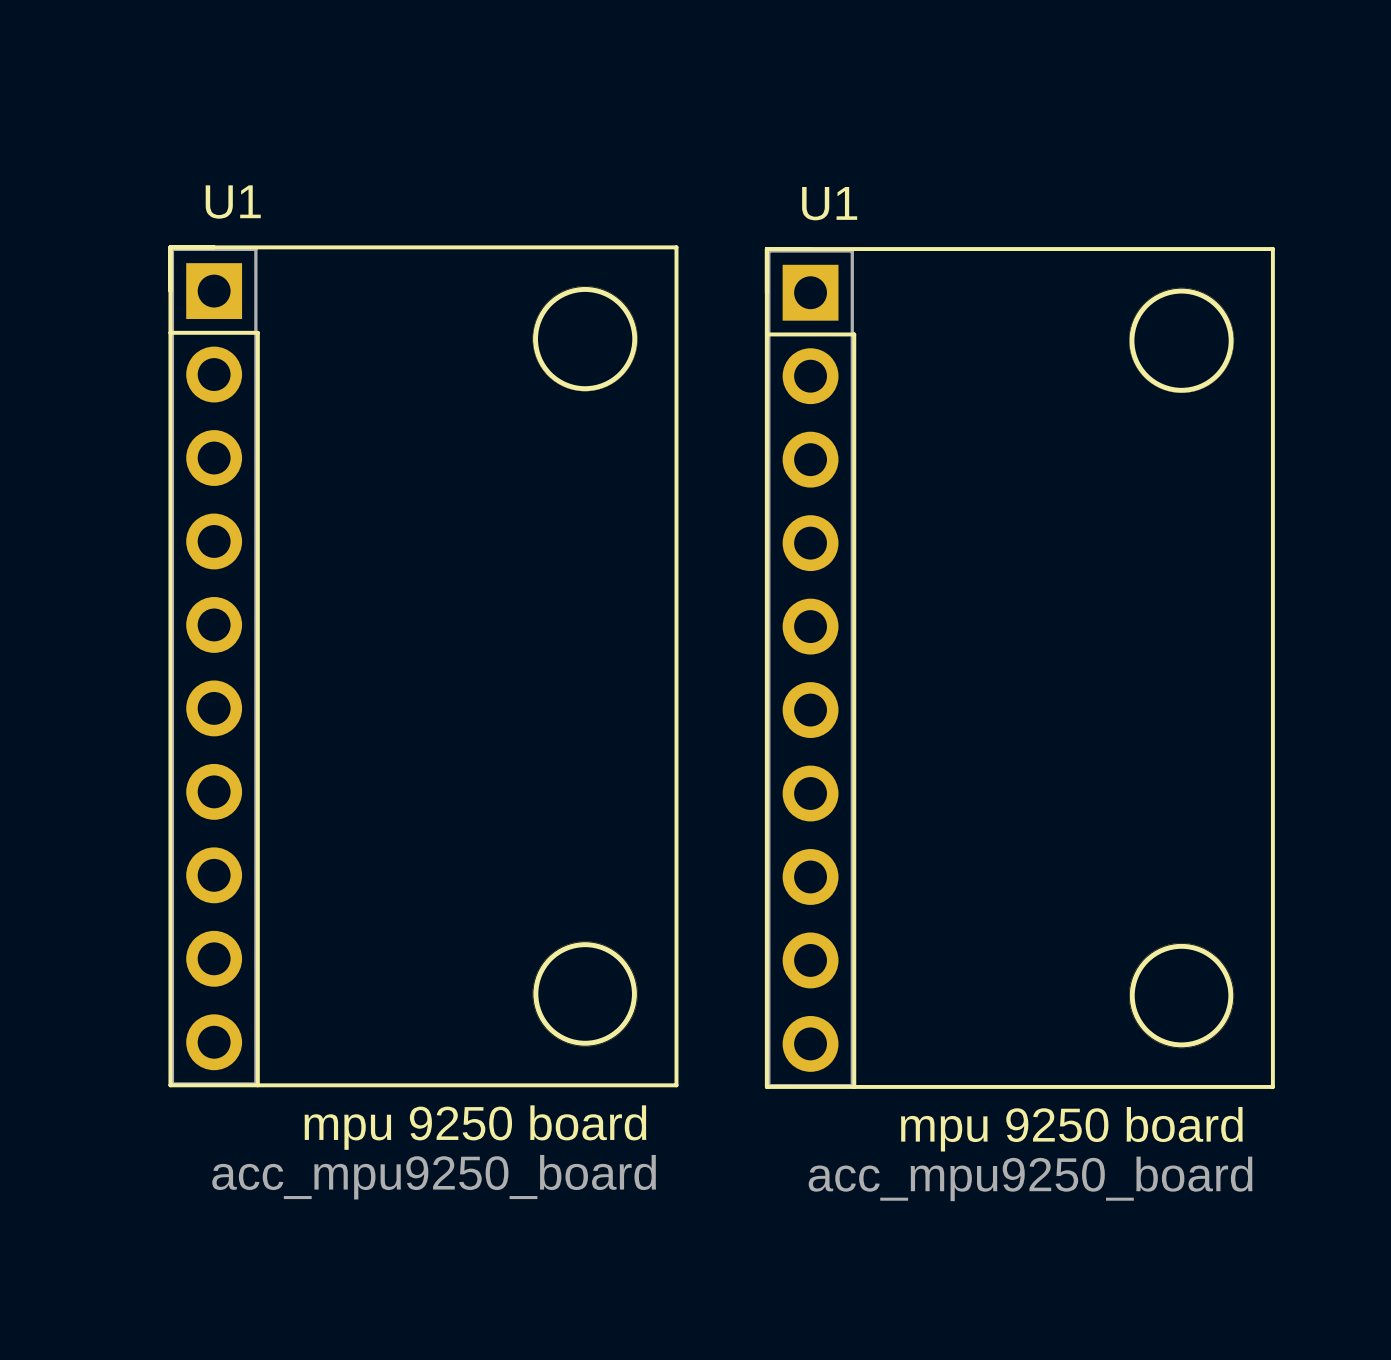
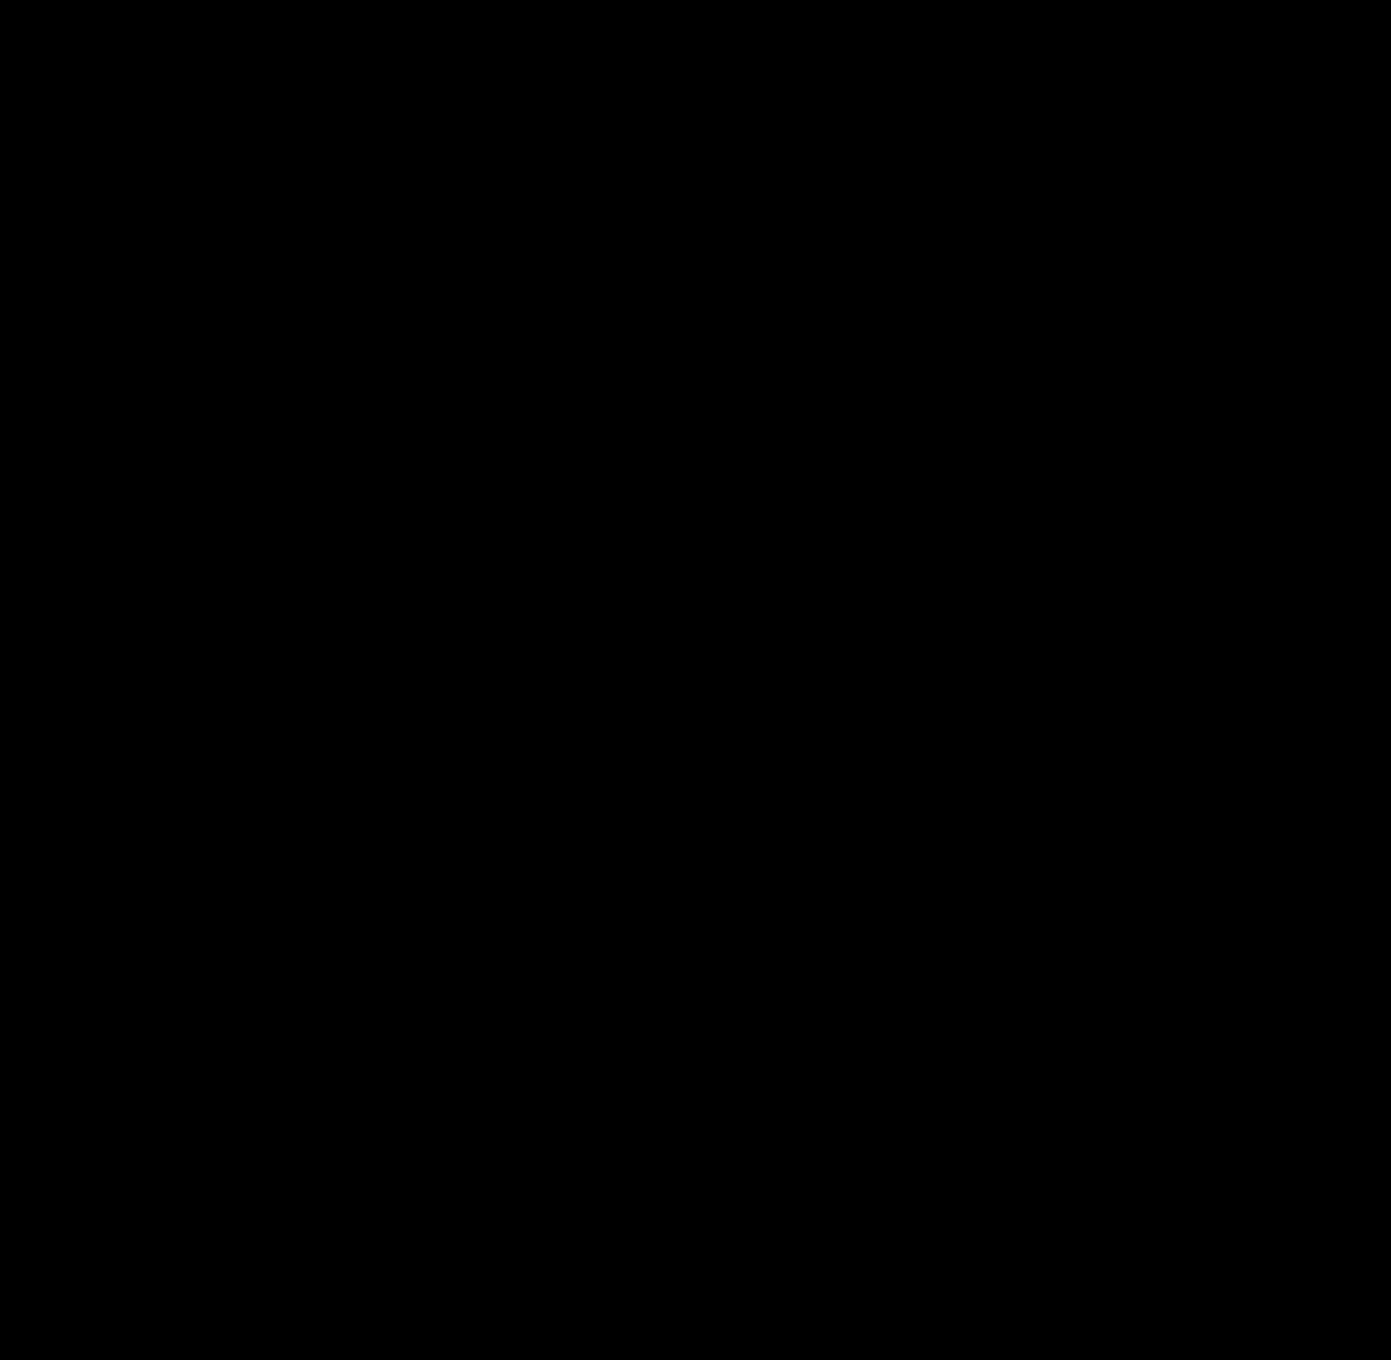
U1: acc_mpu9250_board (423, 666) -> none
U1: acc_mpu9250_board (1019, 667) -> none

